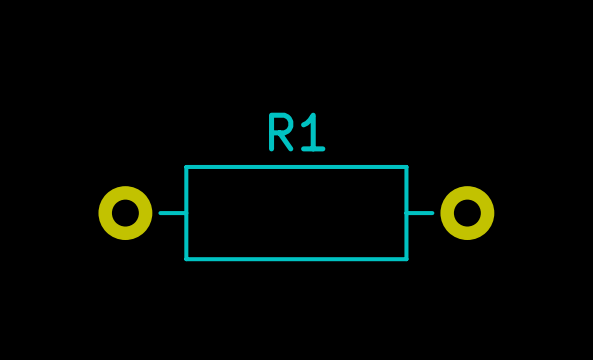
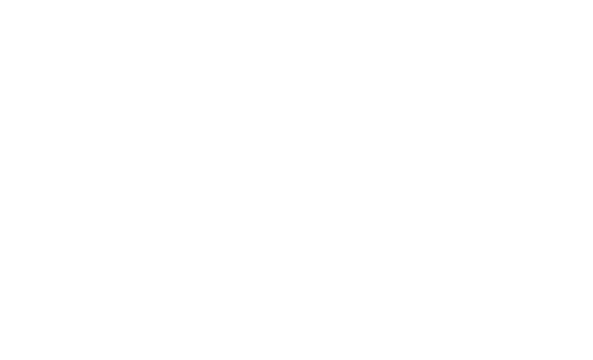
R1: (296, 213) -> none

